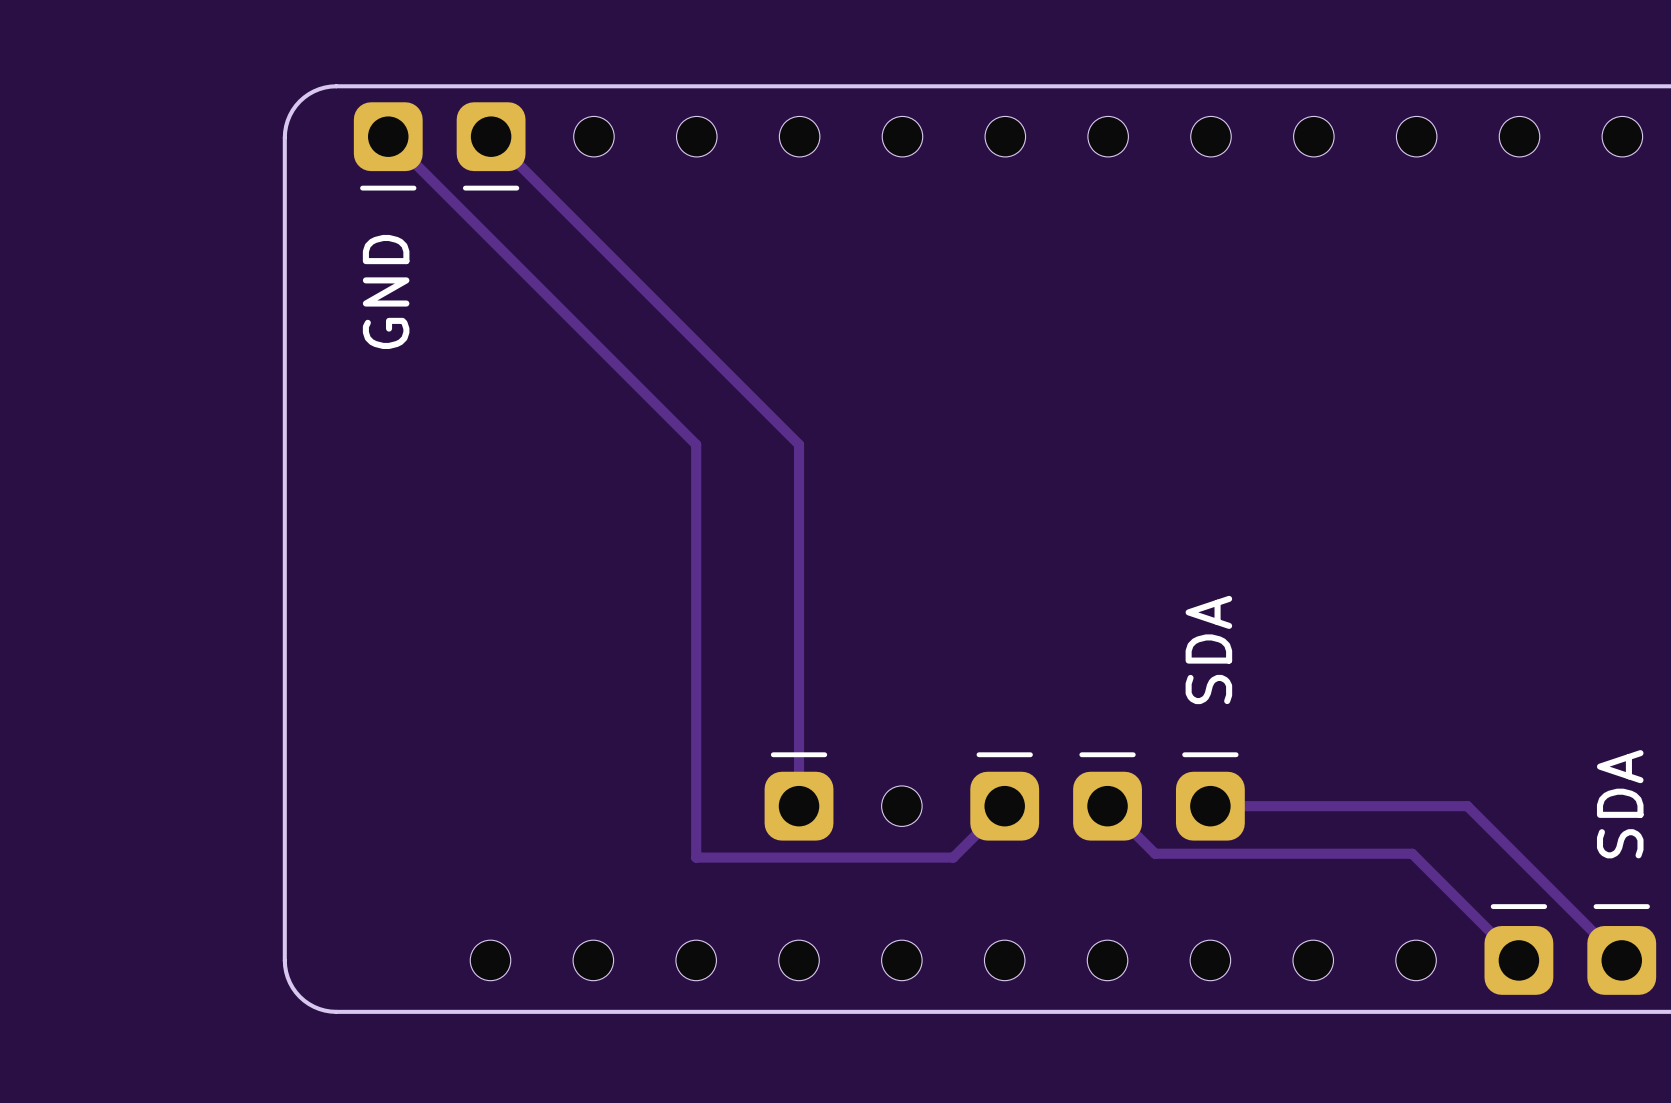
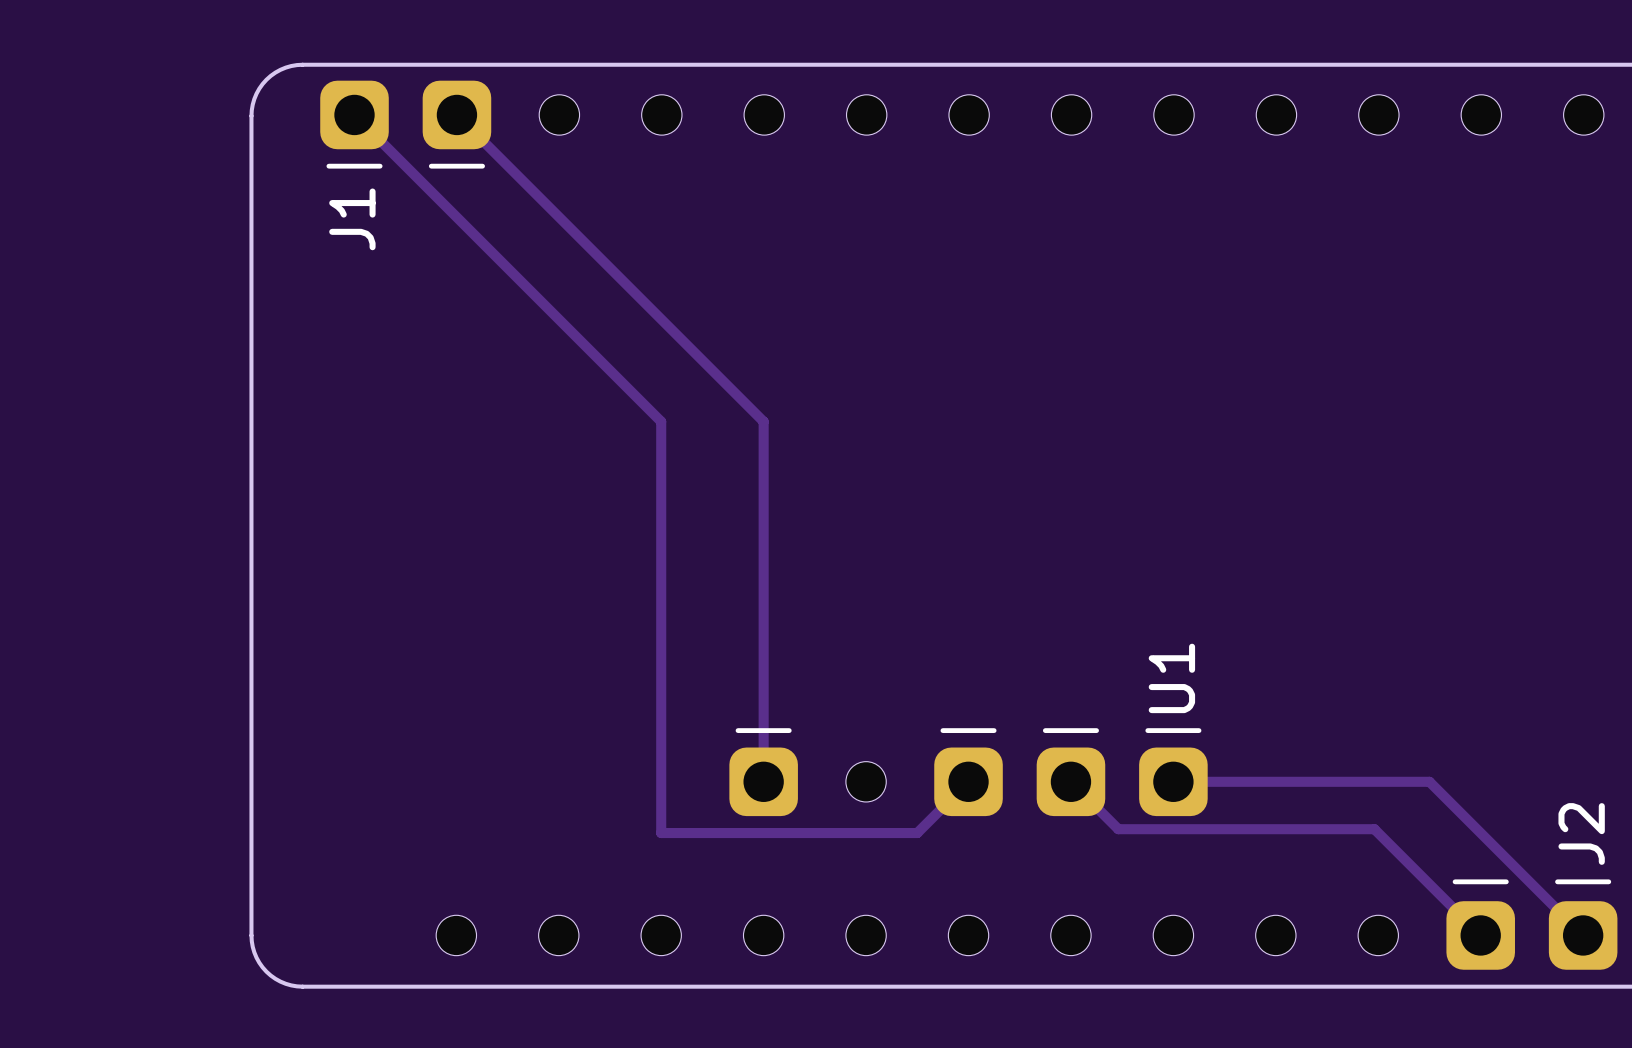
GND name: GND (386, 291) -> J1 (352, 219)
SDA name: SDA (1208, 649) -> U1 (1171, 678)
SDA name: SDA (1620, 804) -> J2 (1581, 833)

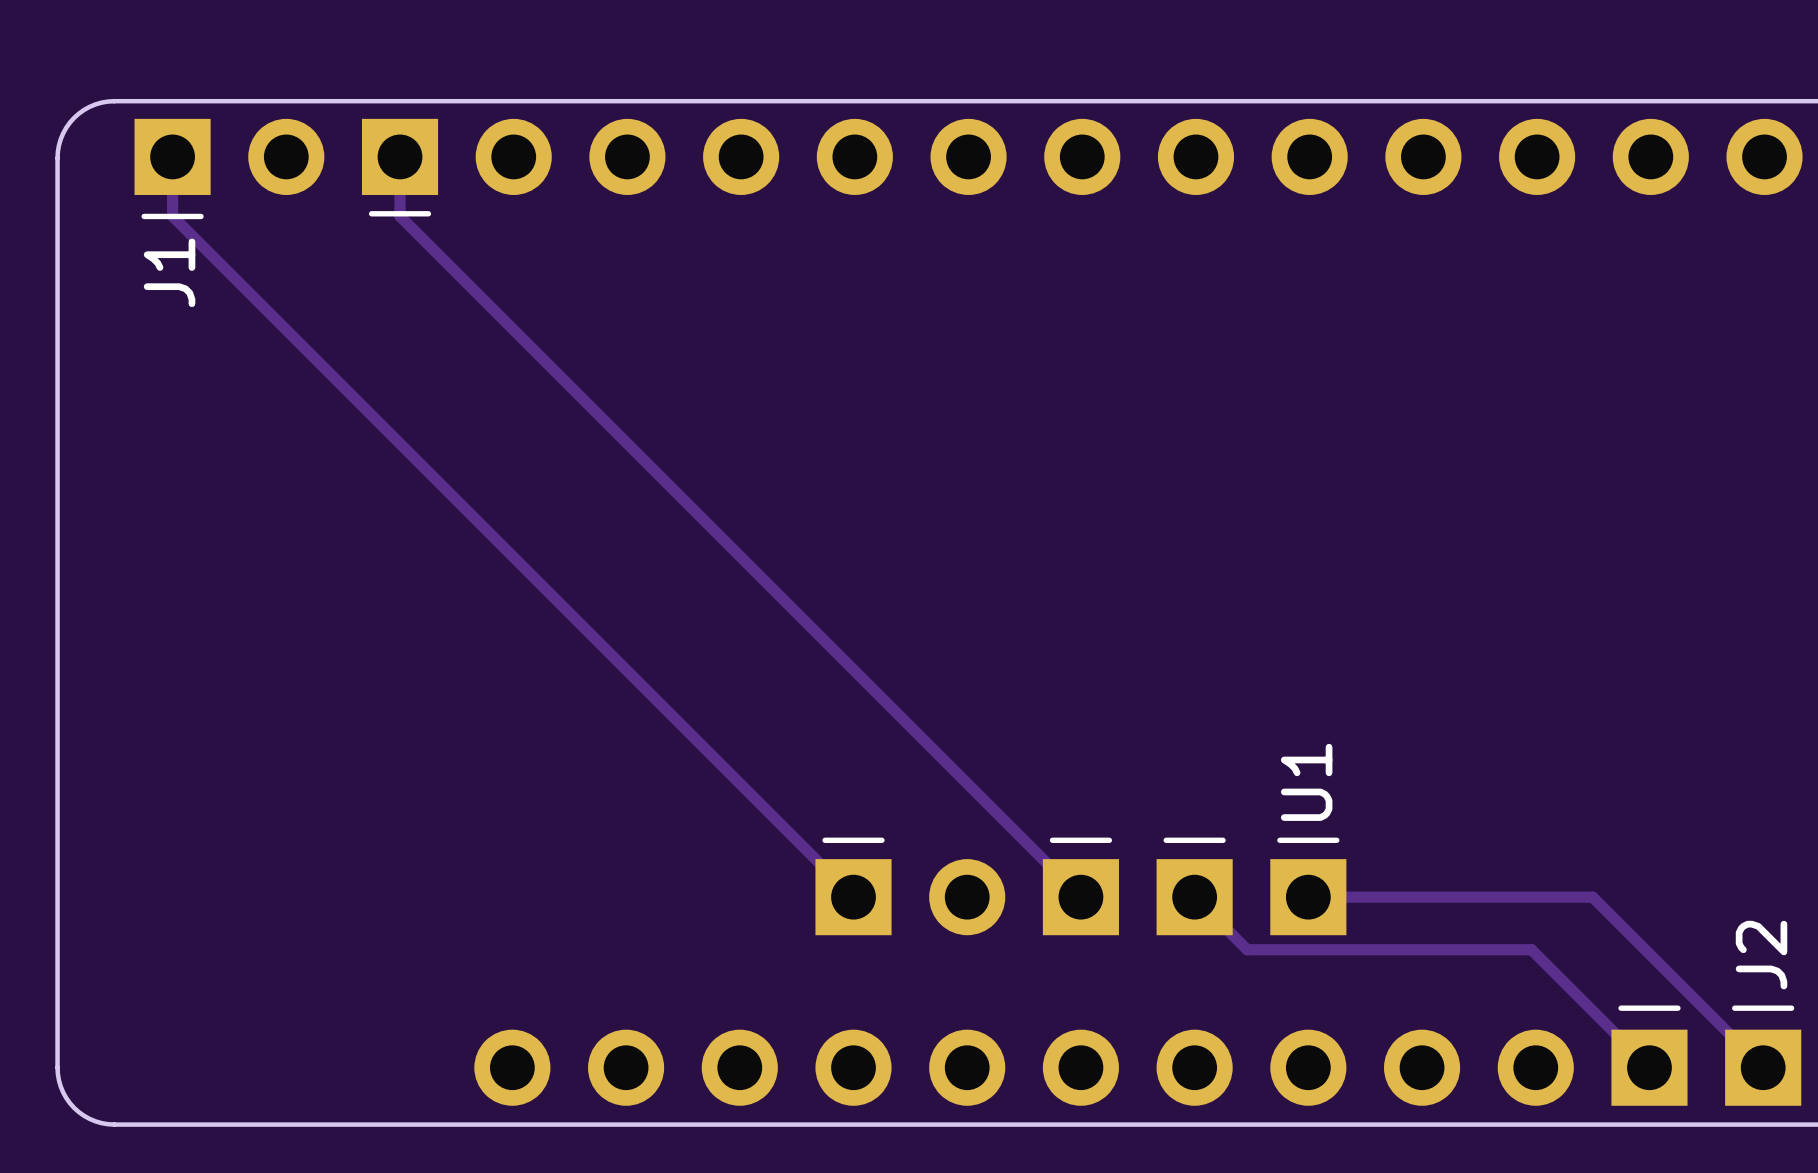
board edge: (302, 64) (285, 67) (266, 79) (256, 93) (251, 115) (251, 941) (256, 957) (266, 971) (280, 981) (302, 986) -> (341, 101) (101, 102) (84, 109) (69, 122) (60, 139) (57, 158) (57, 1067) (60, 1086) (66, 1097) (78, 1112) (89, 1118) (108, 1124) (341, 1124)
J1 footprint: [320, 80, 1604, 169] -> [134, 118, 1803, 220]
track: (354, 114) (661, 421) (661, 833) (917, 833) (968, 781) -> (400, 156) (400, 216) (1080, 897)
track: (456, 114) (763, 421) (763, 781) -> (172, 156) (172, 216) (853, 897)
J1 name position: J1 (352, 219) -> J1 (169, 272)
U1 footprint: [729, 728, 1208, 817] -> [815, 837, 1347, 936]
J2 footprint: [436, 879, 1618, 970] -> [474, 1005, 1802, 1106]

